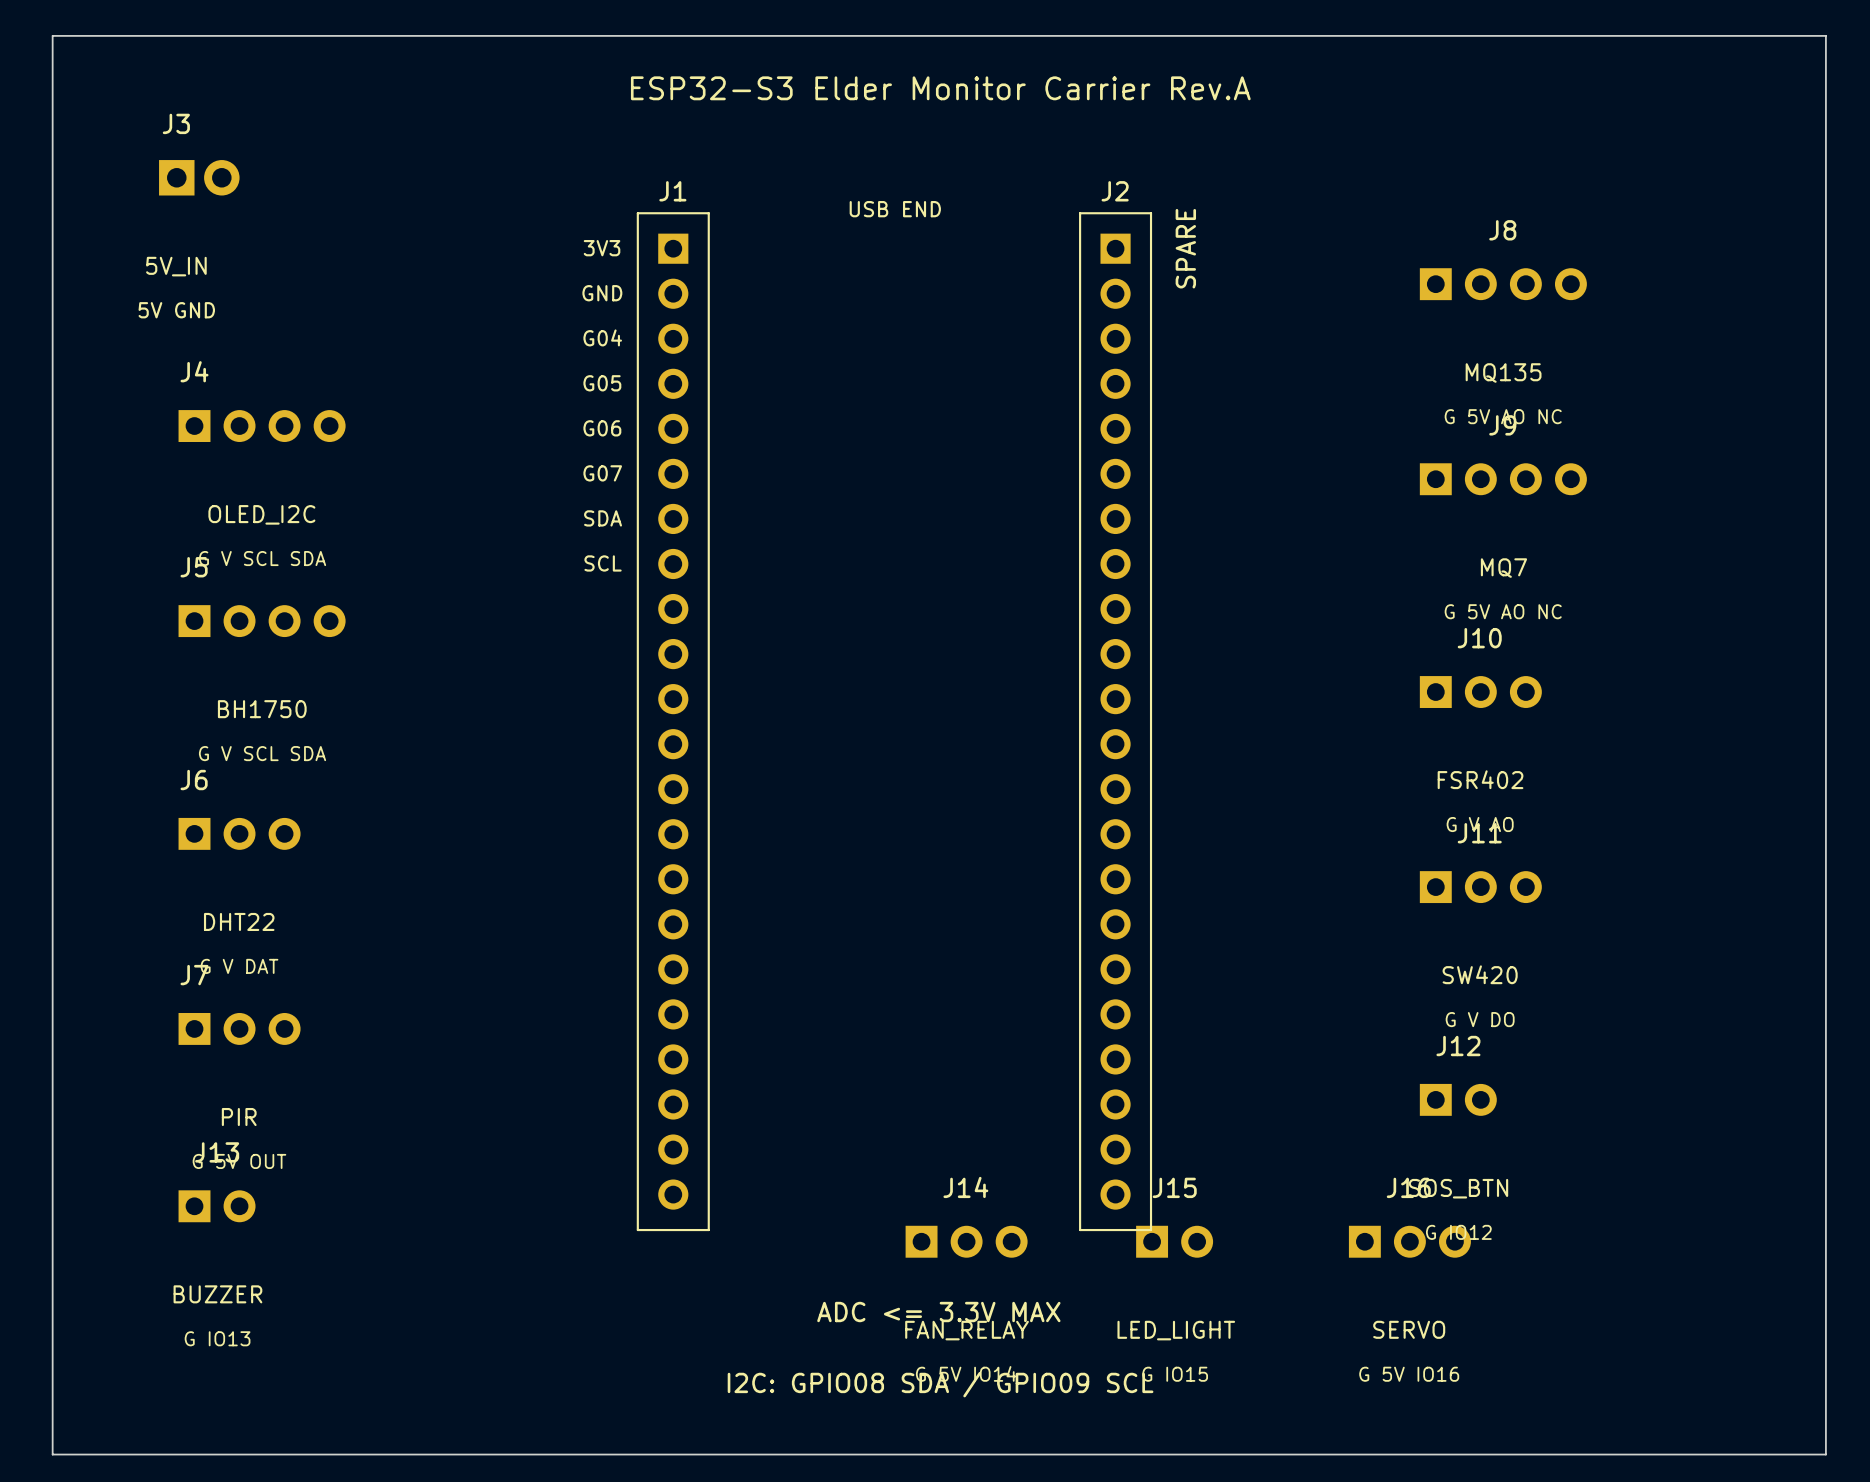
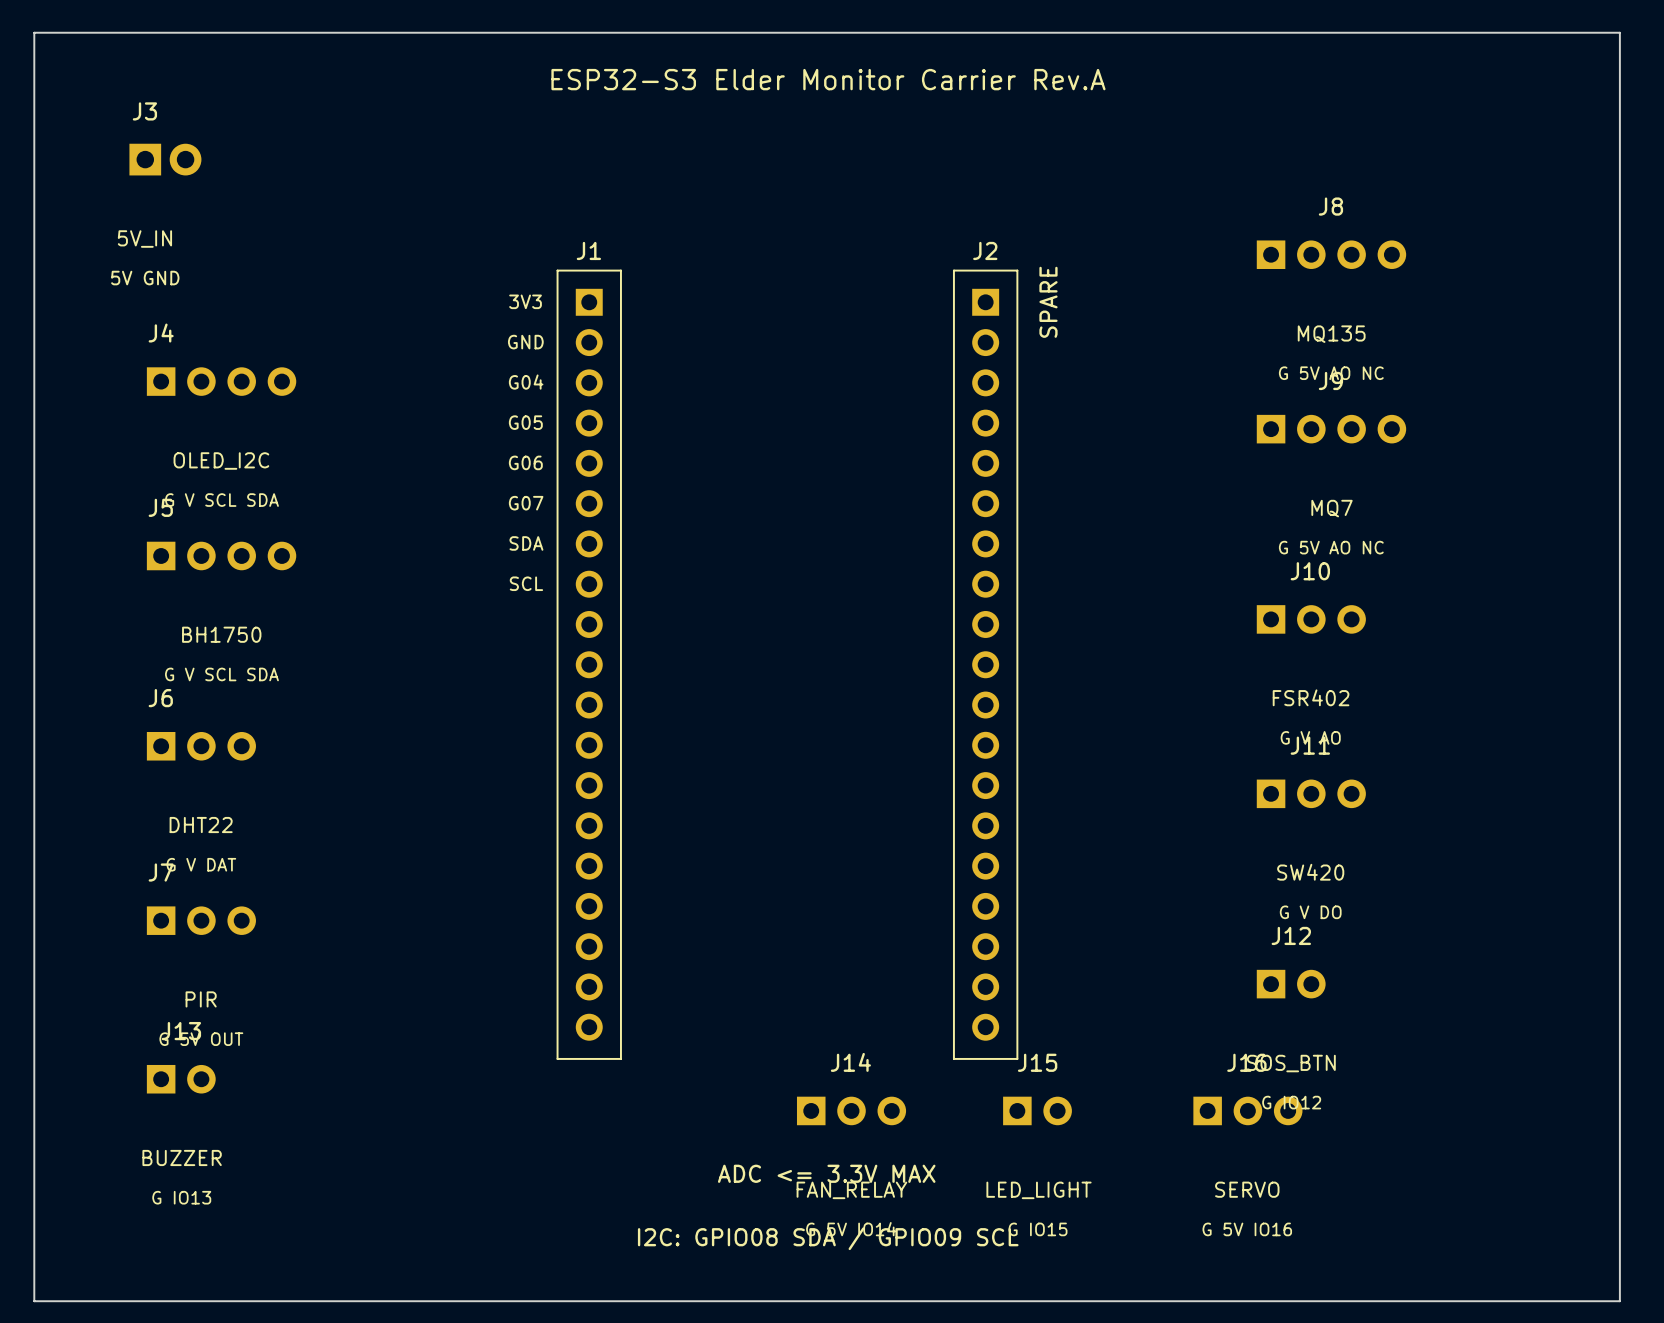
J1 name position: J1 (672, 191) -> J1 (588, 250)
J2 name position: J2 (1115, 191) -> J2 (985, 250)
text: USB END (895, 209) -> none
J1 footprint: [636, 212, 710, 1232] -> [556, 269, 622, 1060]
J2 footprint: [1079, 212, 1153, 1232] -> [952, 269, 1019, 1060]

